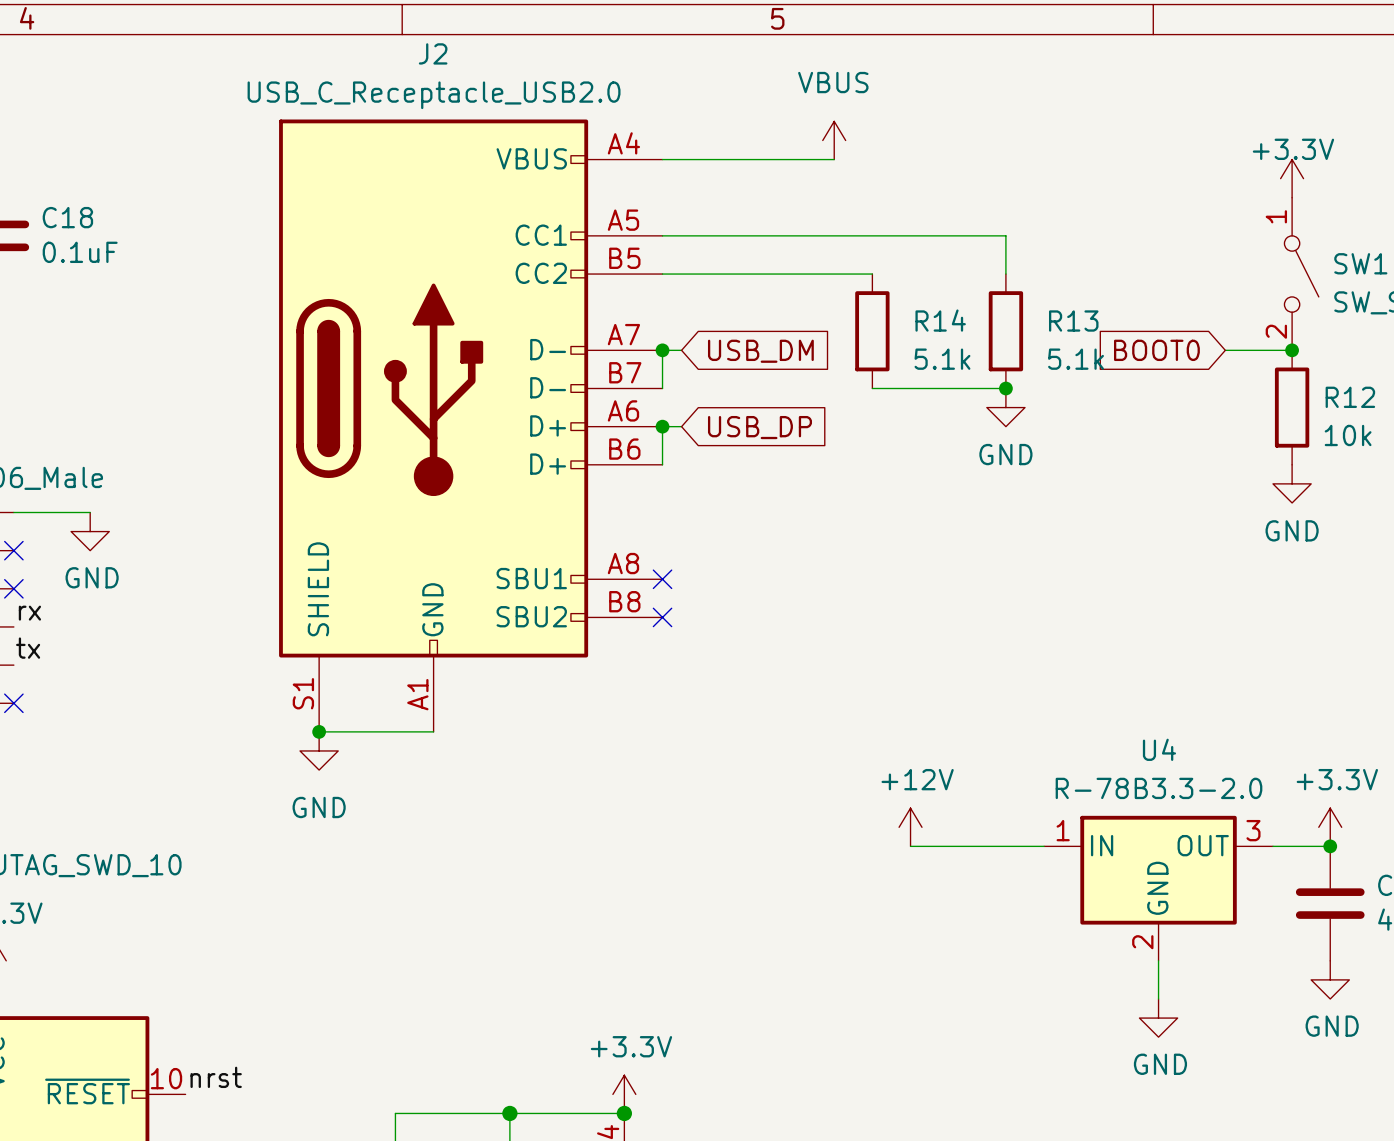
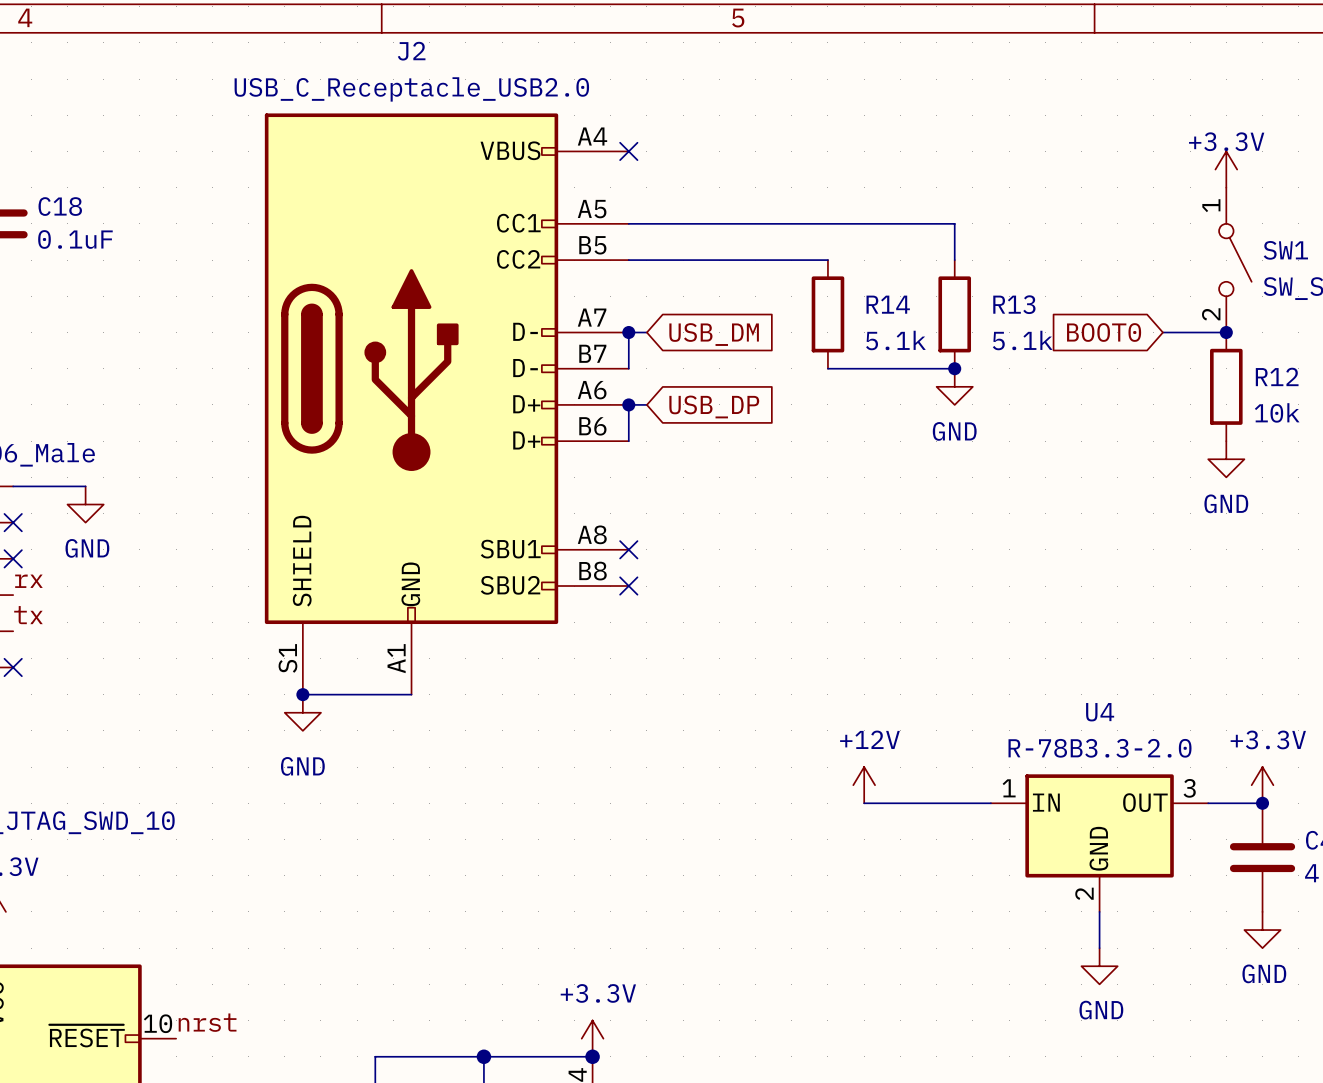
power symbol: VBUS (834, 140) -> none
wire: (662, 159) (834, 159) -> none
no-connect mark: none -> (628, 151)

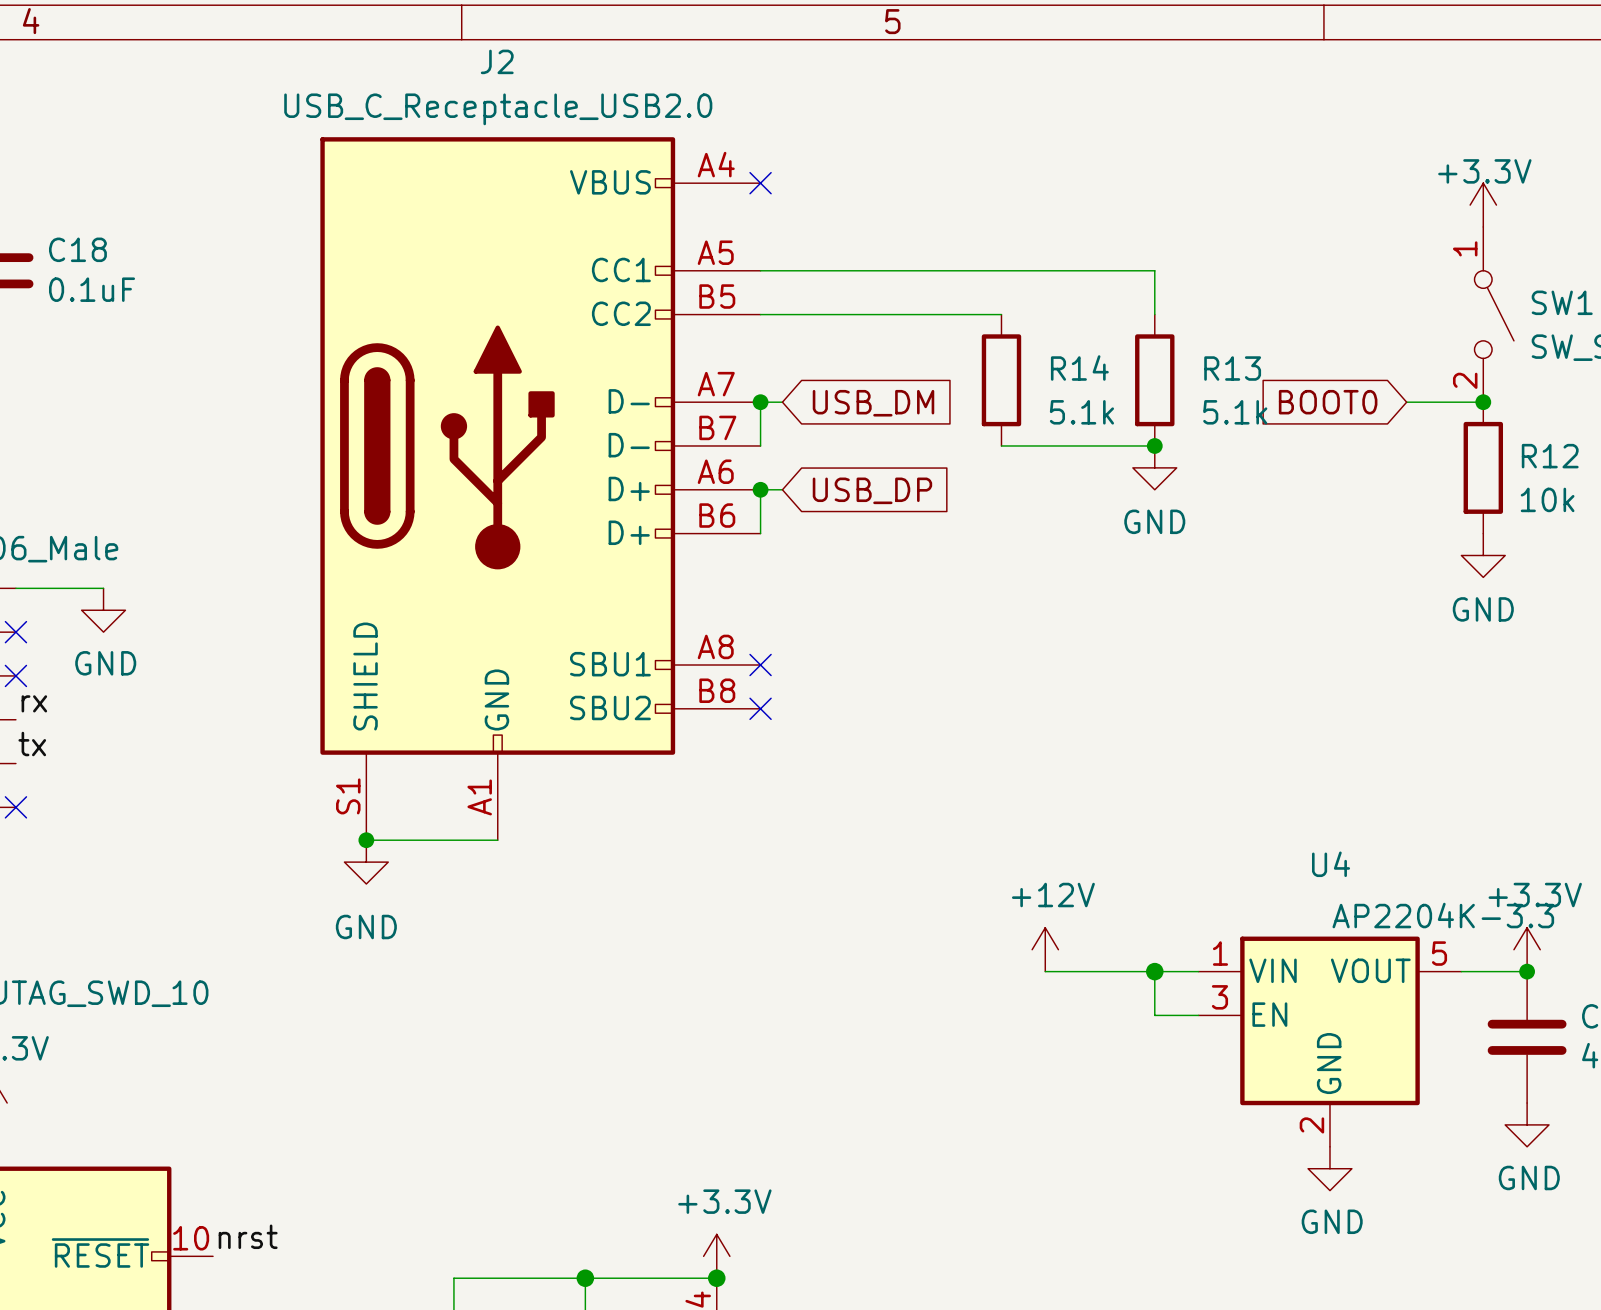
U4 value: R-78B3.3-2.0 (1100, 748) -> AP2204K-3.3 (1443, 915)
U4 symbol: [990, 774, 1209, 912] -> [1198, 936, 1462, 1147]
wire: none -> (1154, 971) (1154, 1015) (1198, 1015)
junction: none -> (1154, 971)

